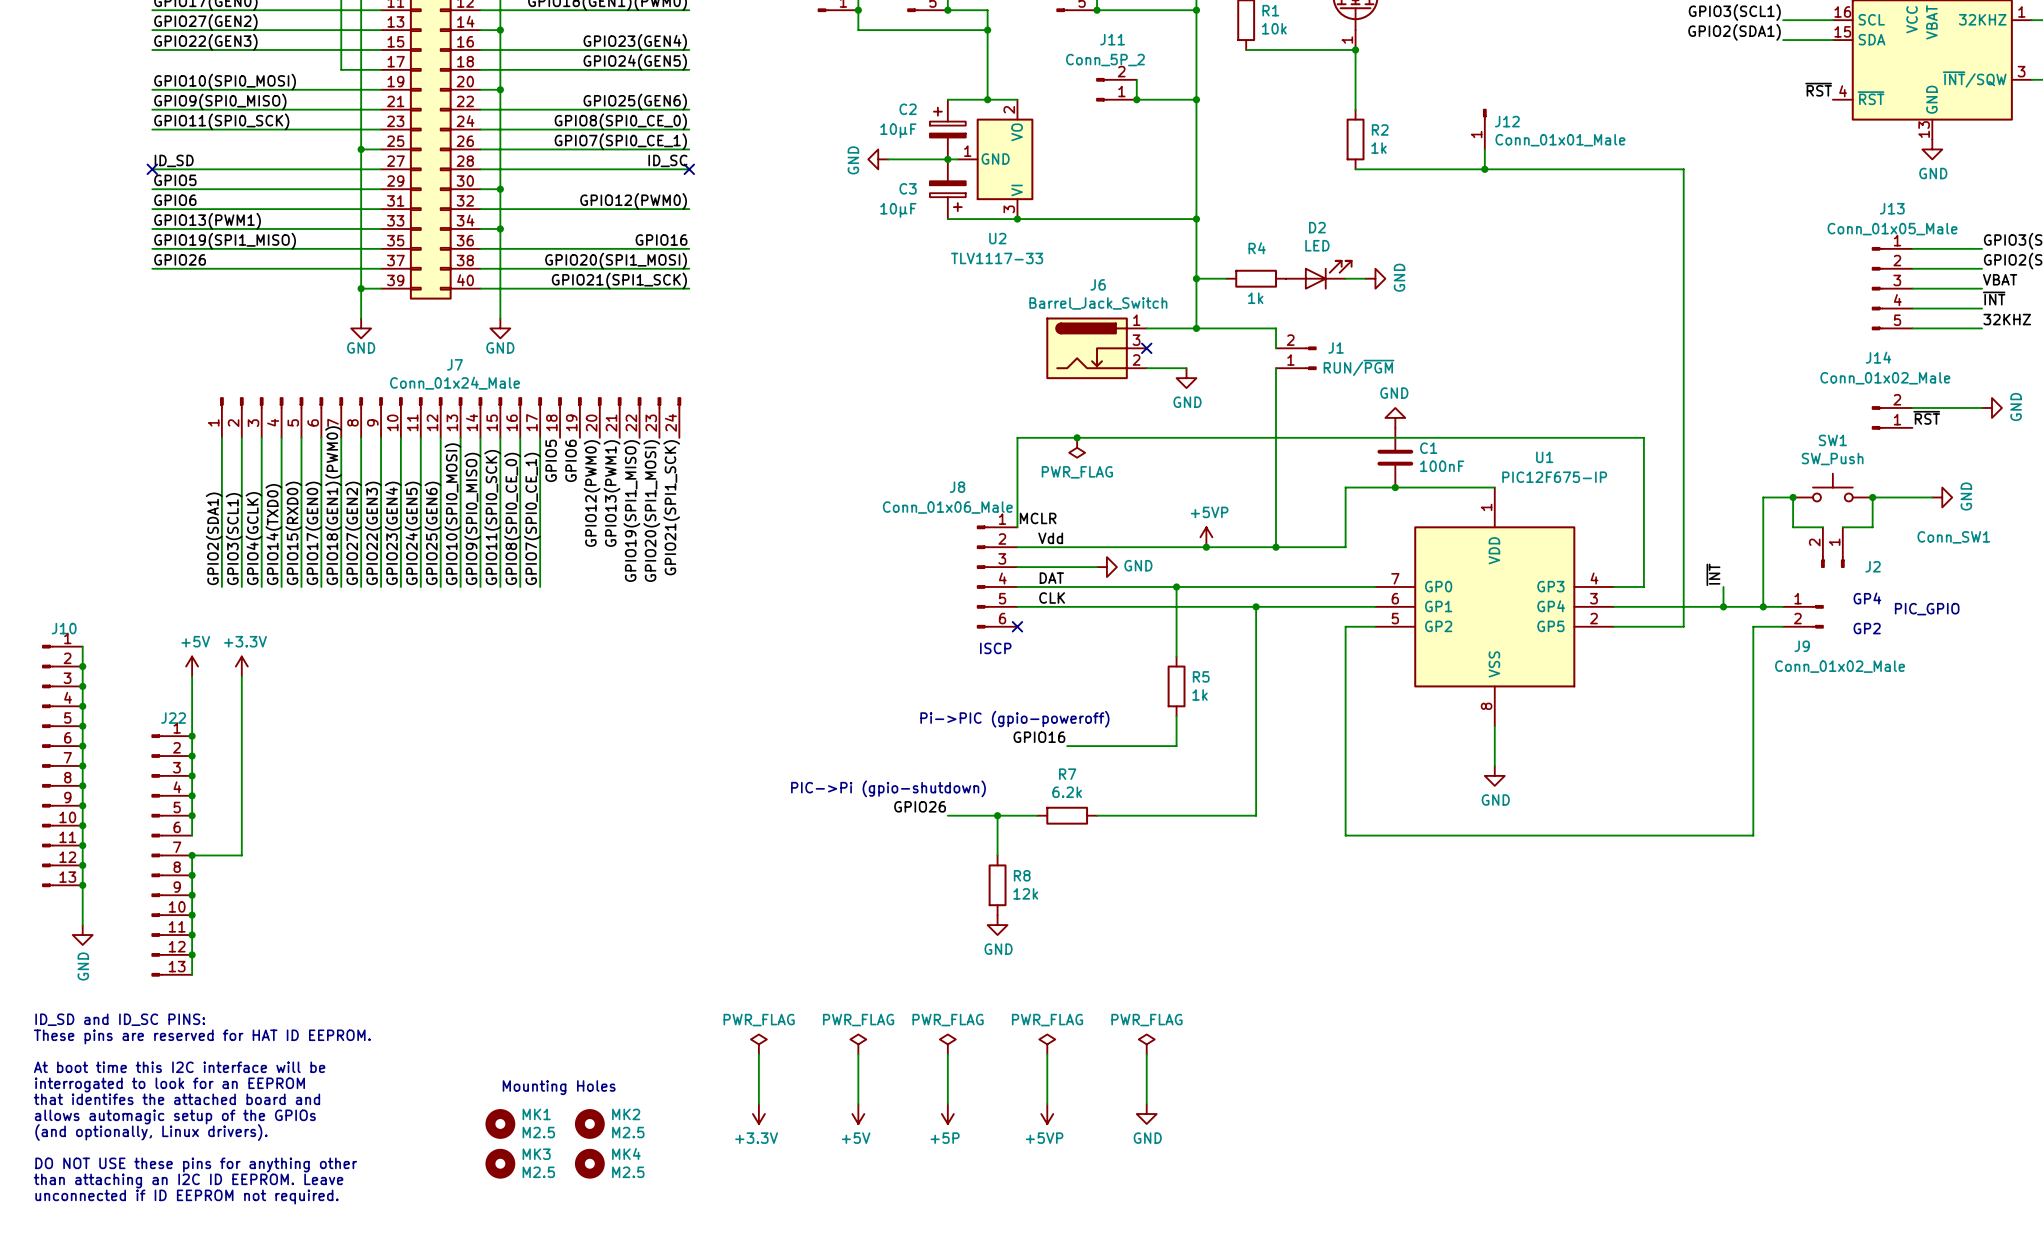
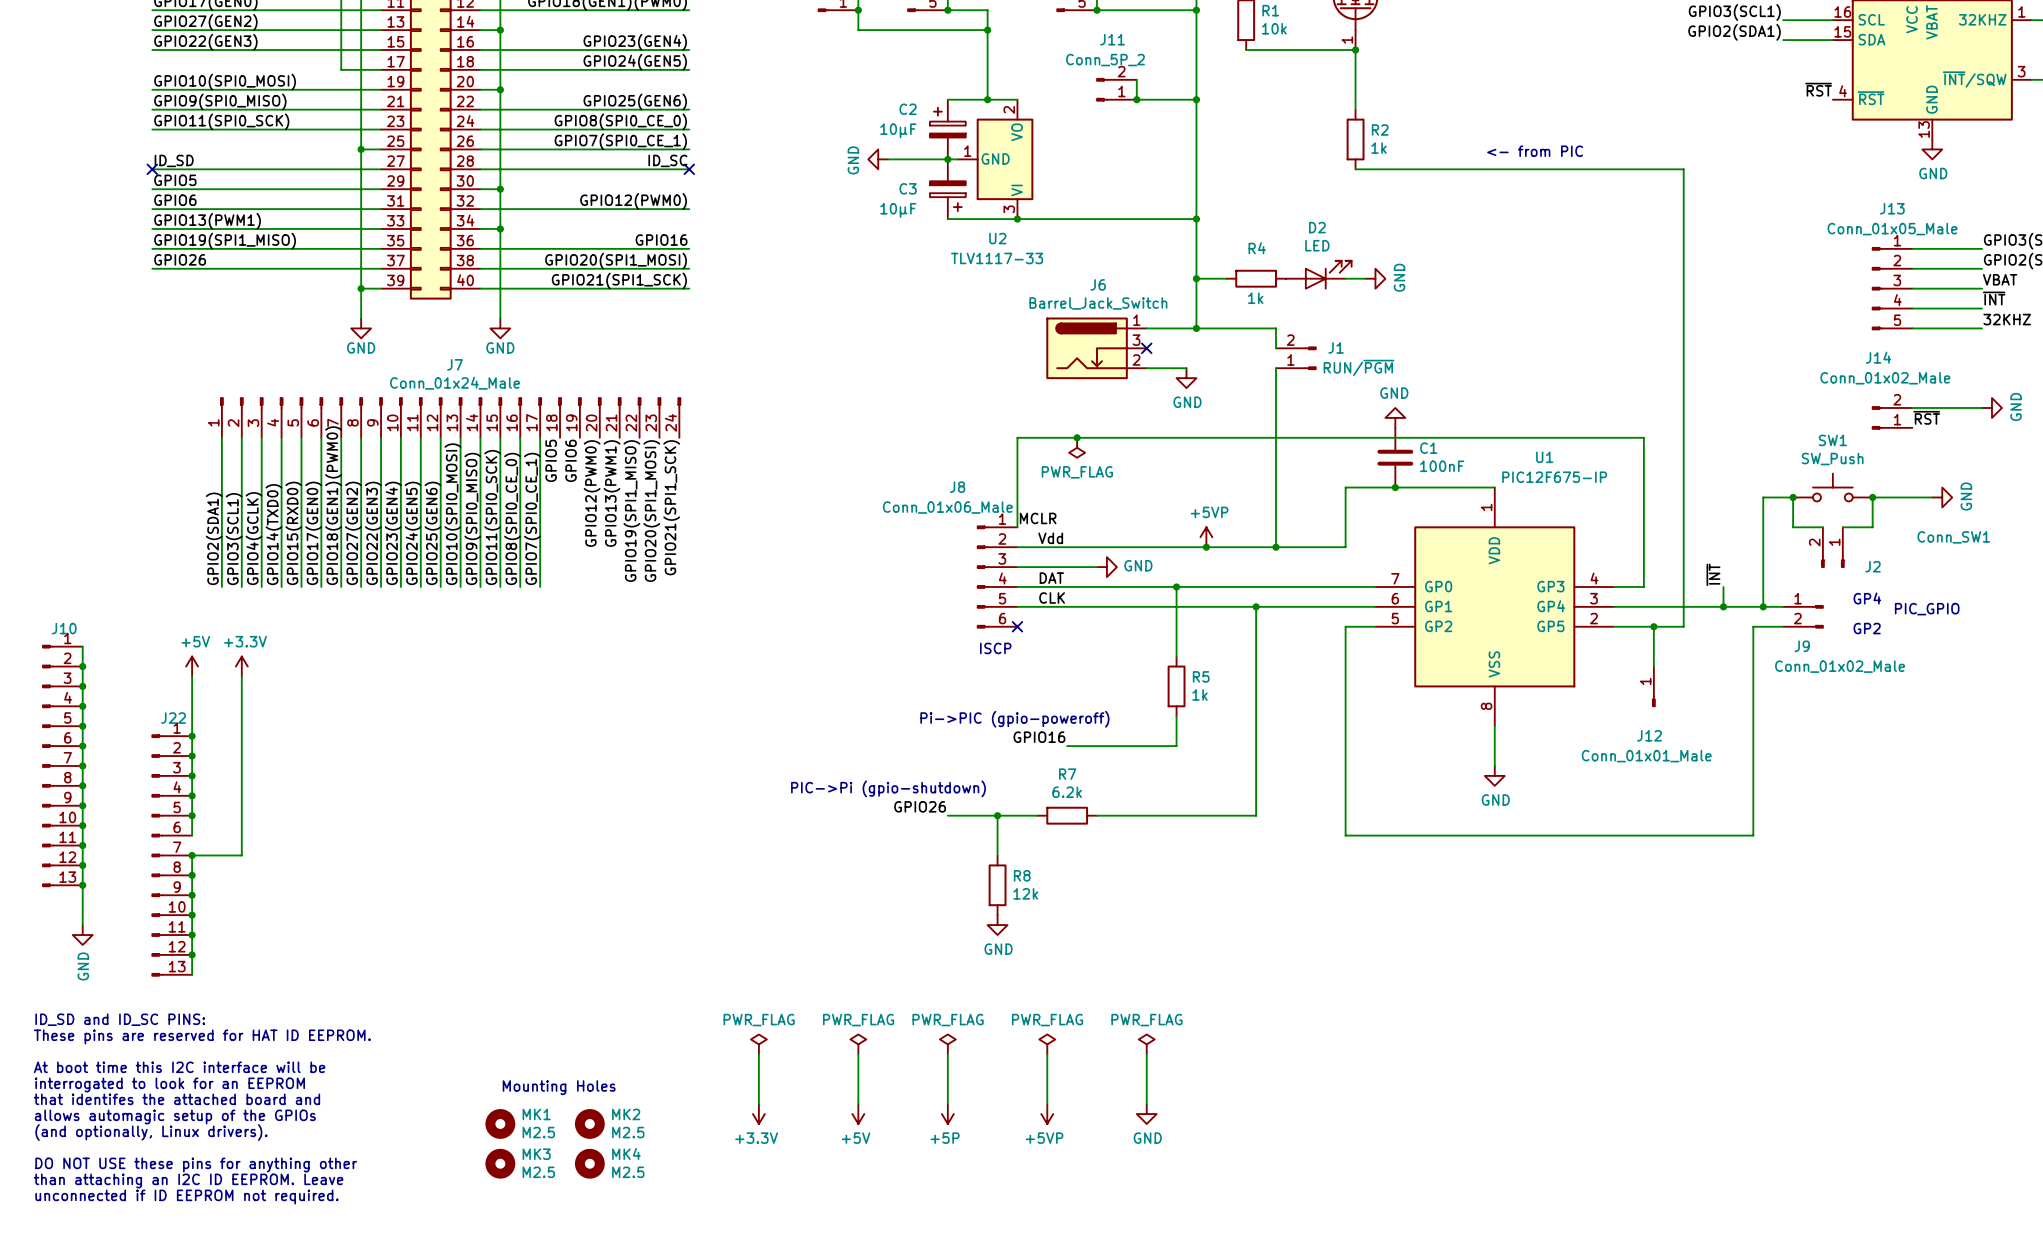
J12 rotation: 0° (1484, 114) -> 180° (1653, 701)
J12 name position: J12 (1507, 121) -> J12 (1649, 735)
J12 position: (1484, 129) -> (1653, 686)
J12 value position: Conn_01x01_Male (1560, 140) -> Conn_01x01_Male (1646, 756)
wire: (1484, 149) (1484, 169) -> none
text: none -> <- from PIC (1535, 151)
junction: (1484, 169) -> none
wire: none -> (1653, 626) (1653, 666)
junction: none -> (1653, 626)

